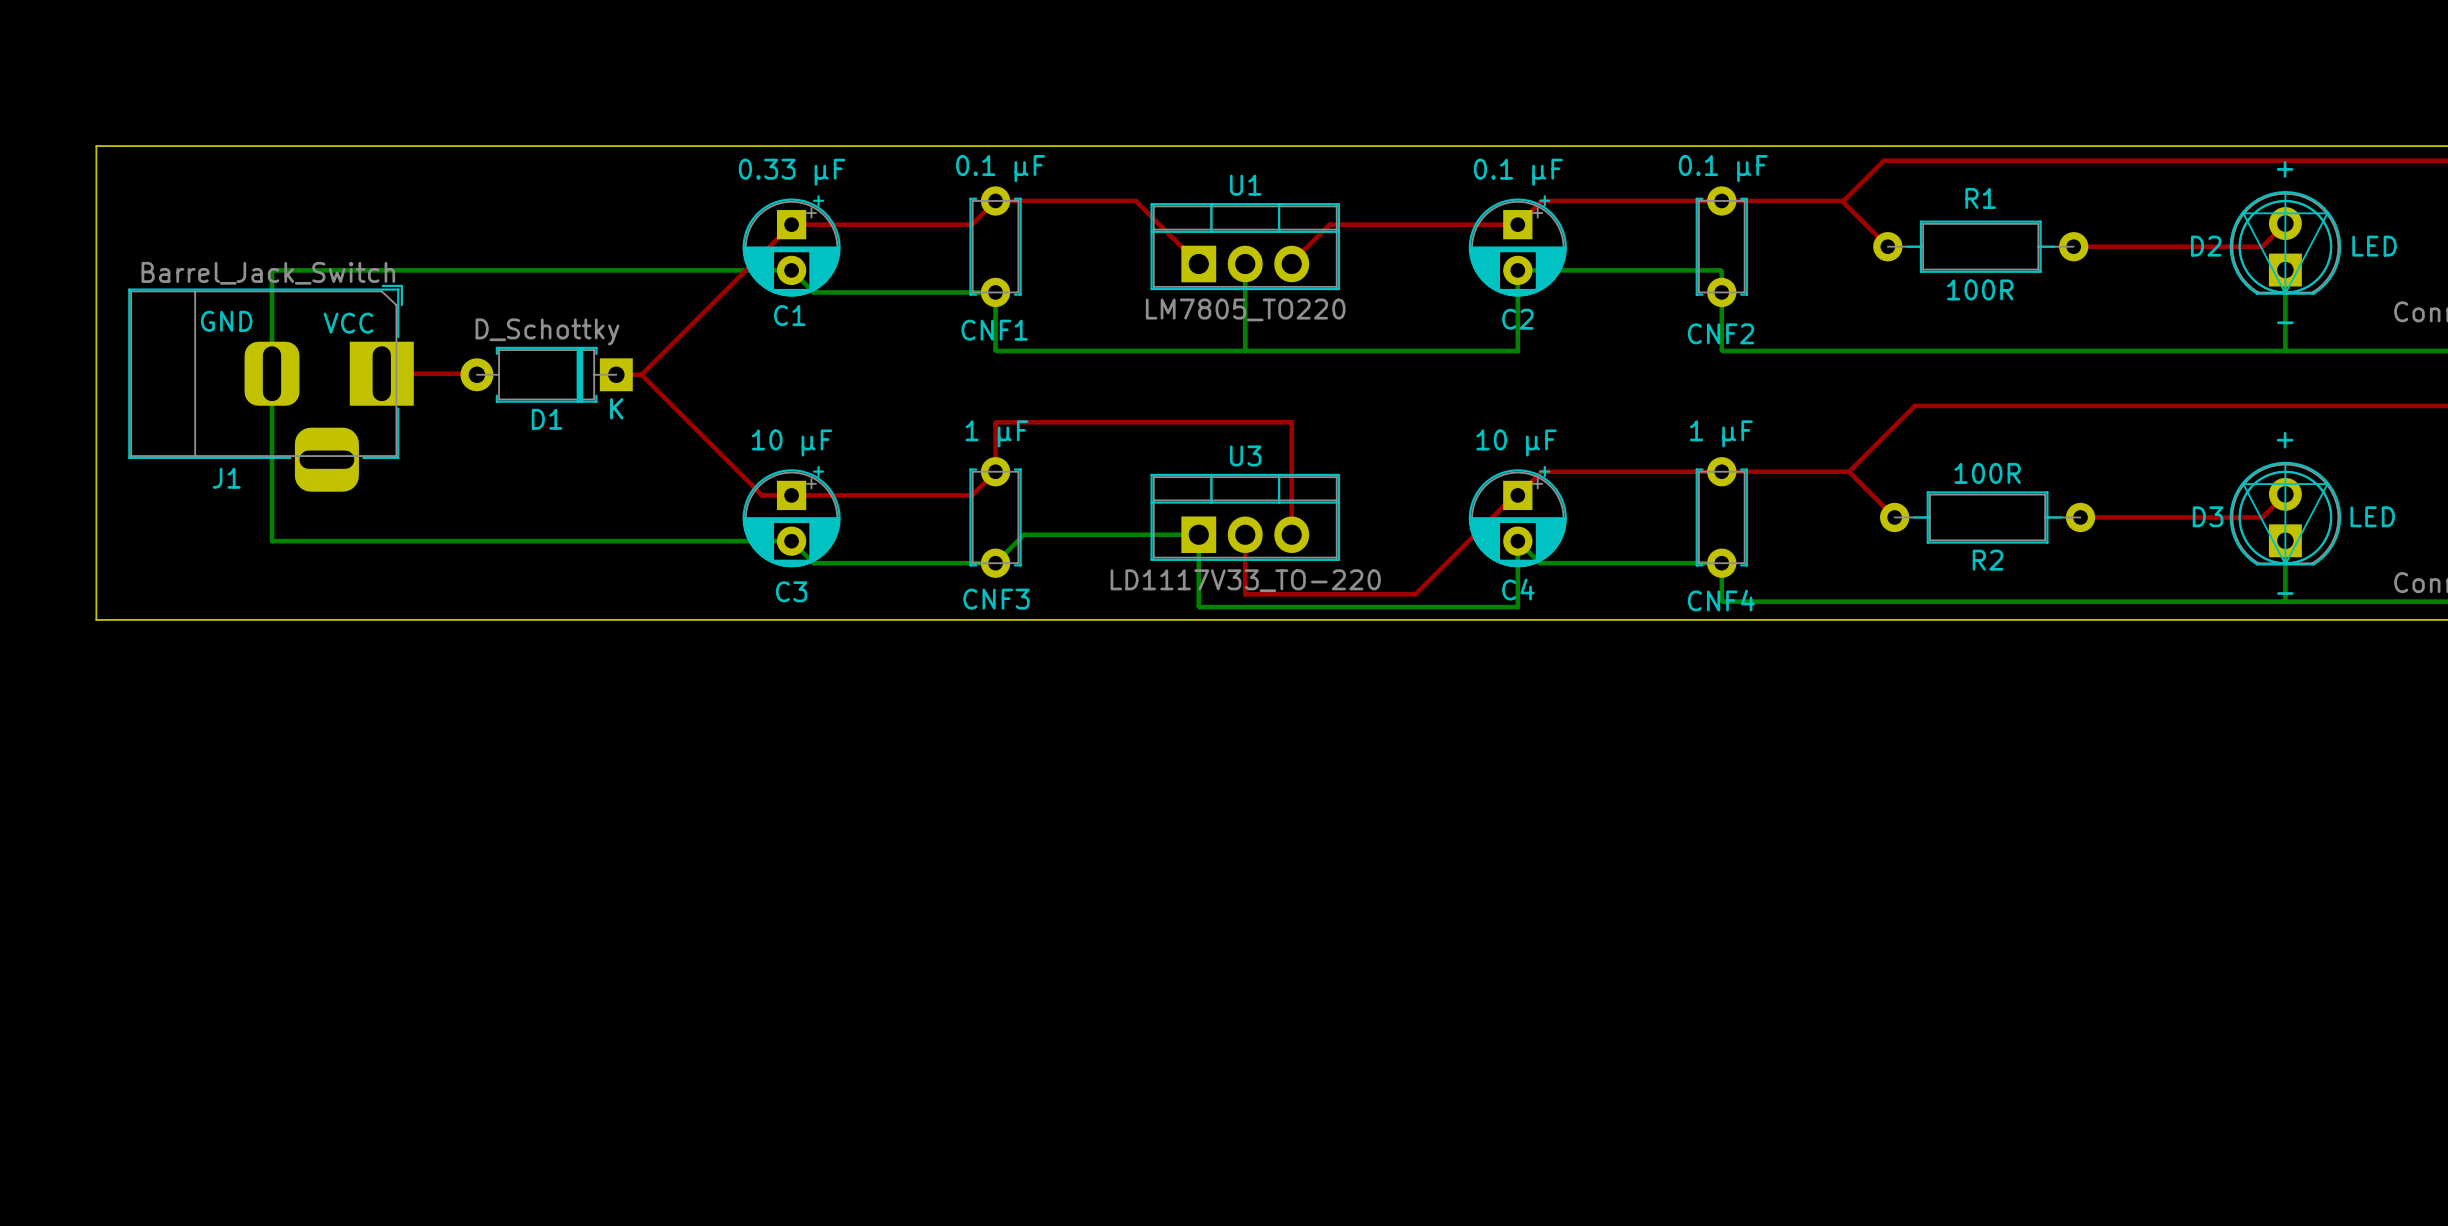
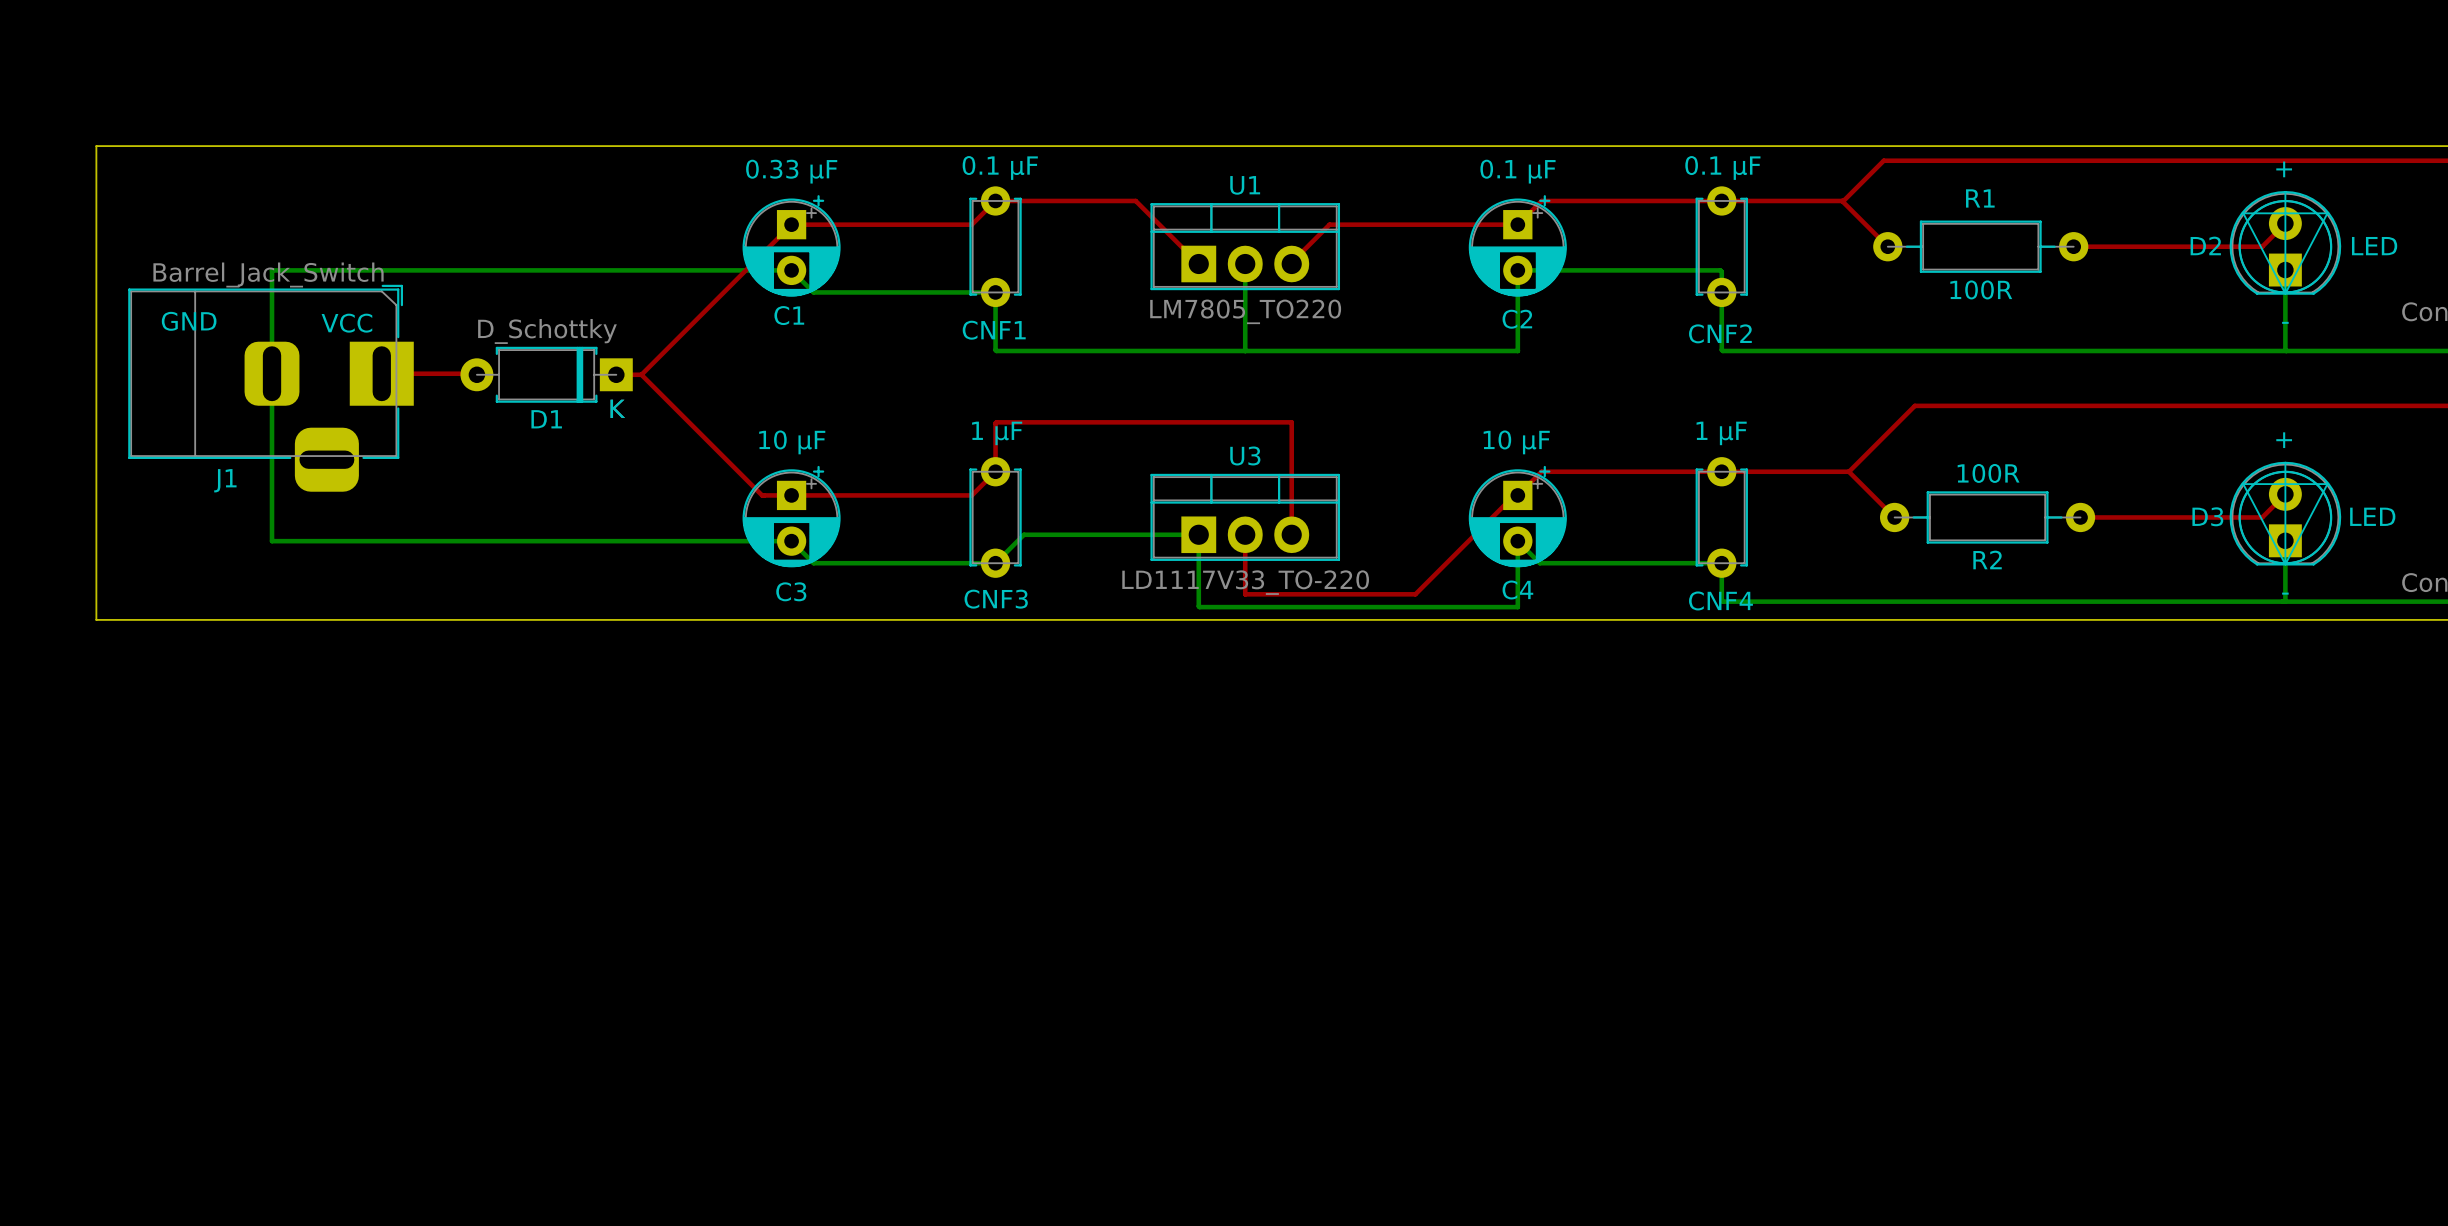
text position: GND (226, 321) -> GND (189, 321)

